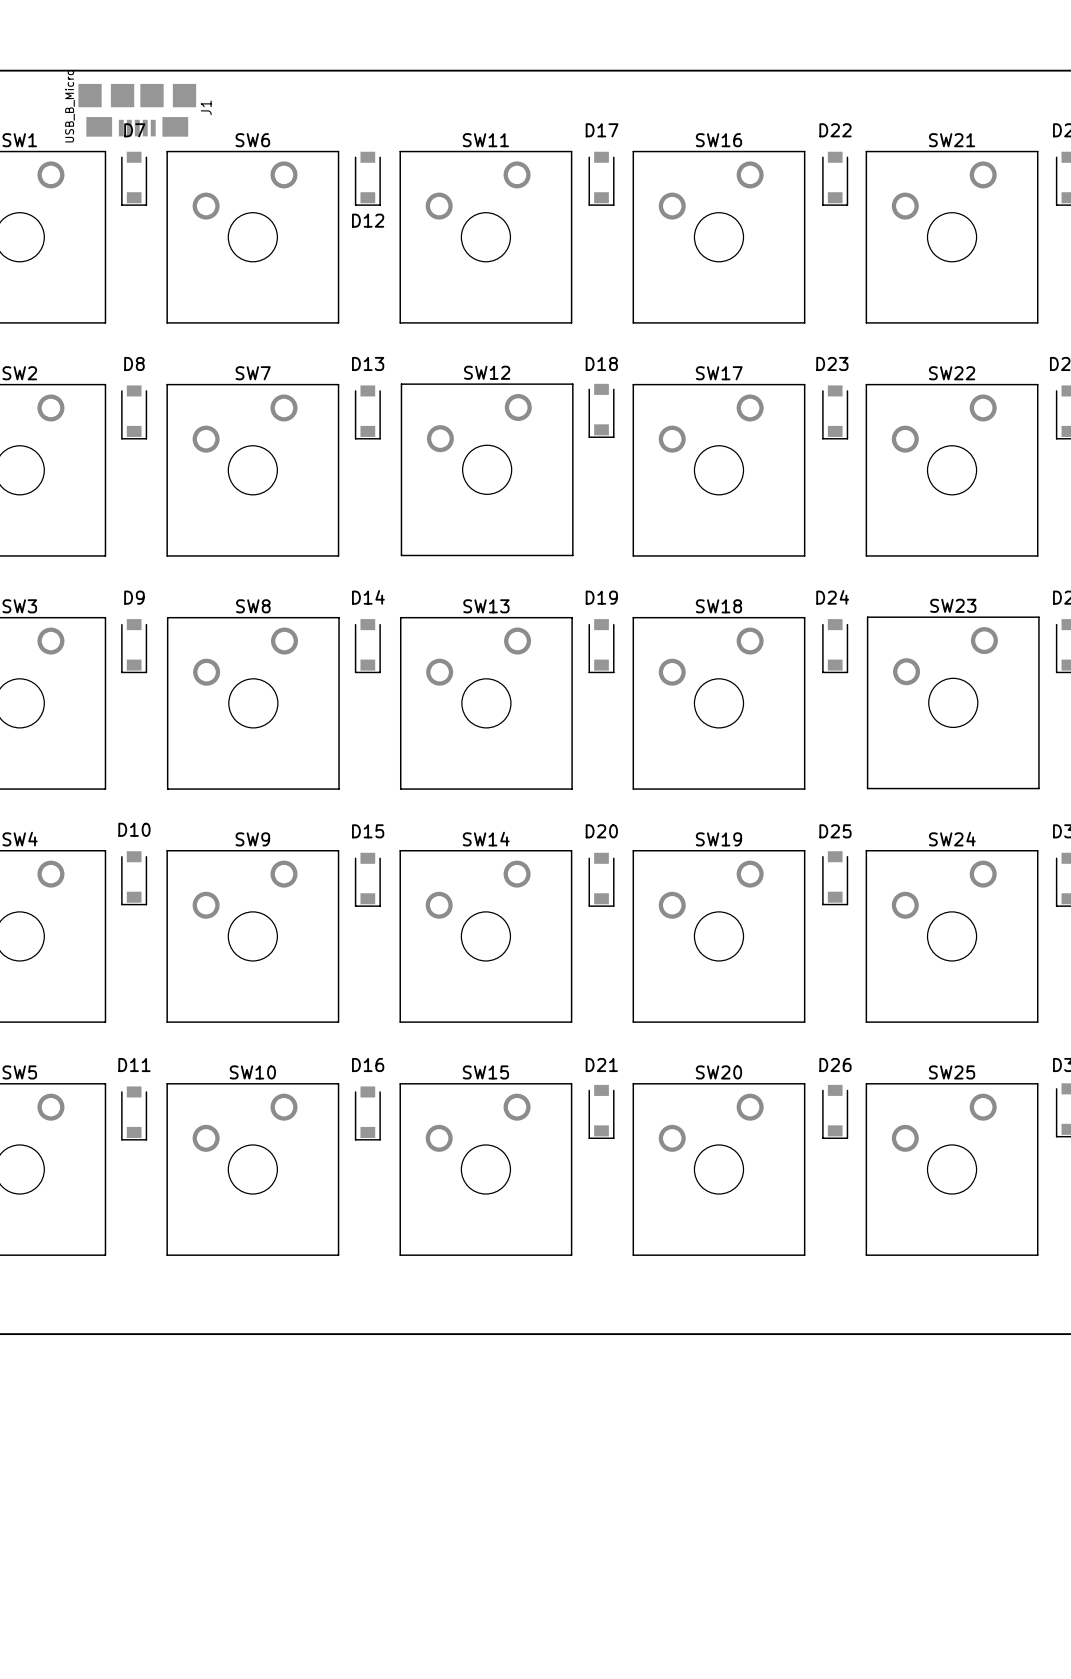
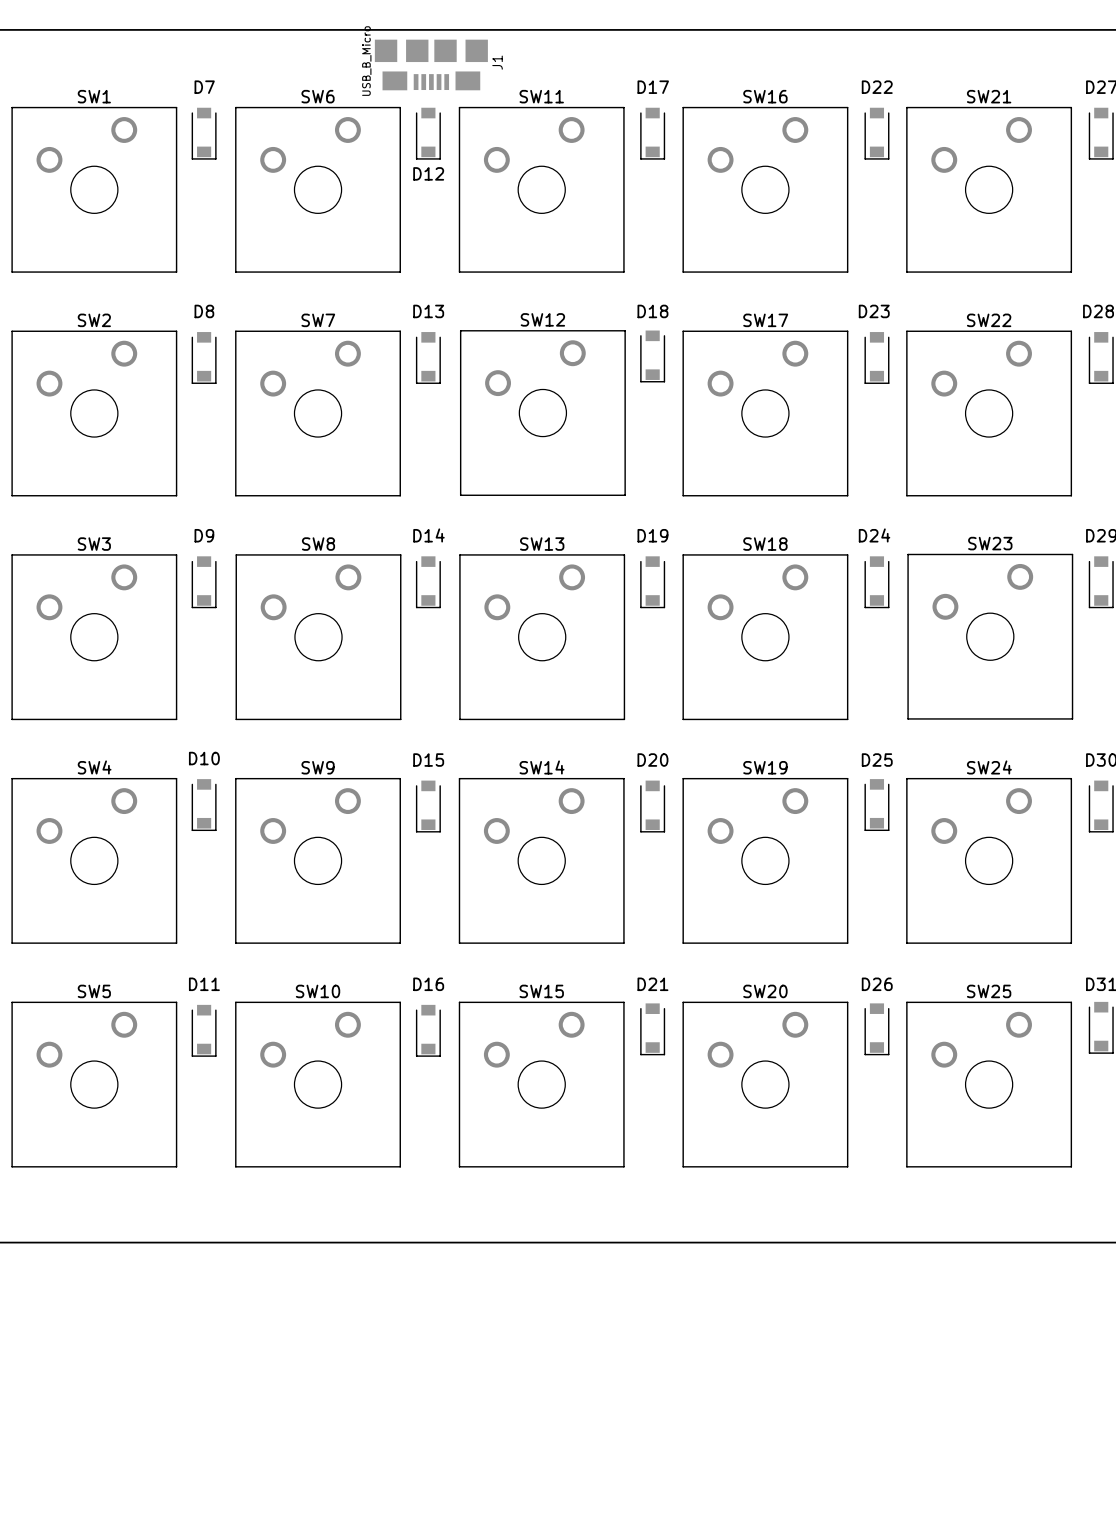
J1 position: (137, 110) -> (431, 64)

